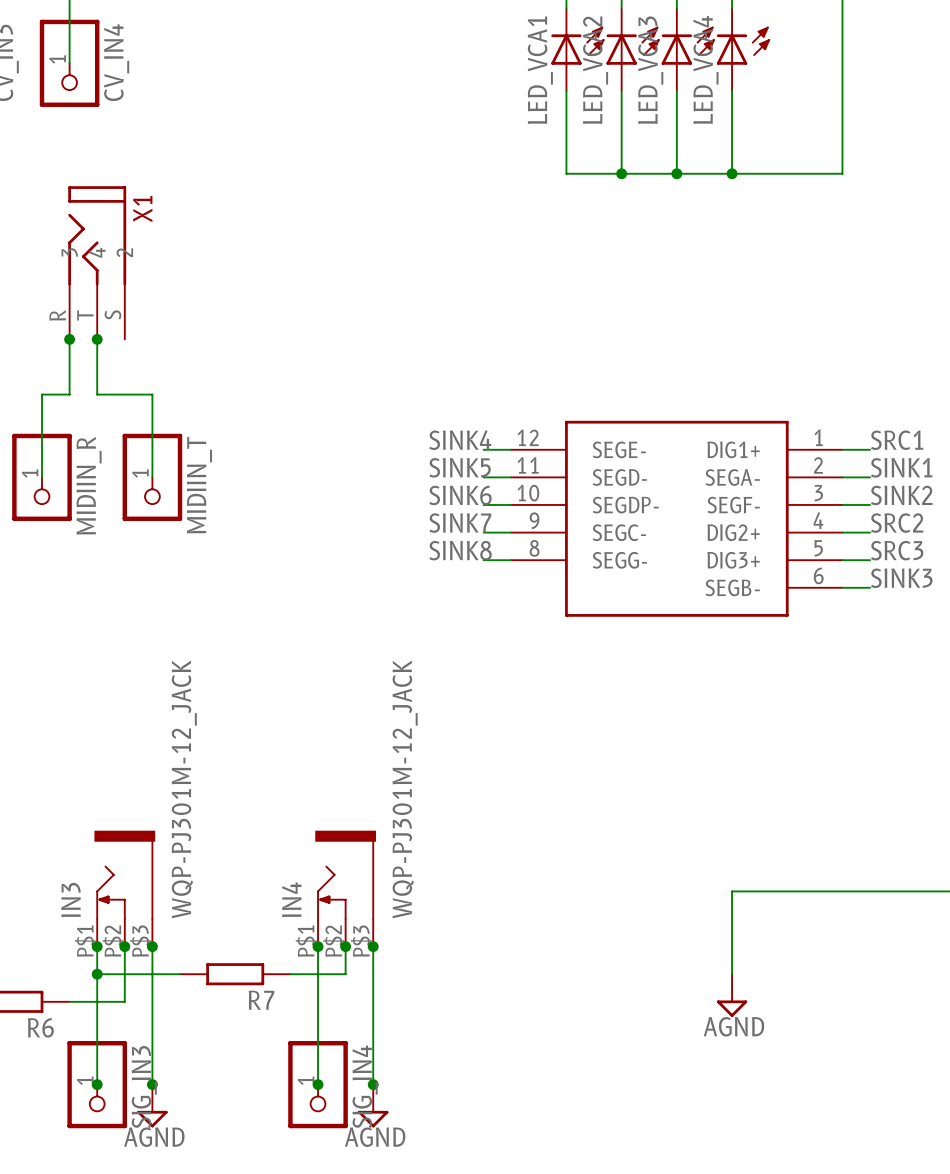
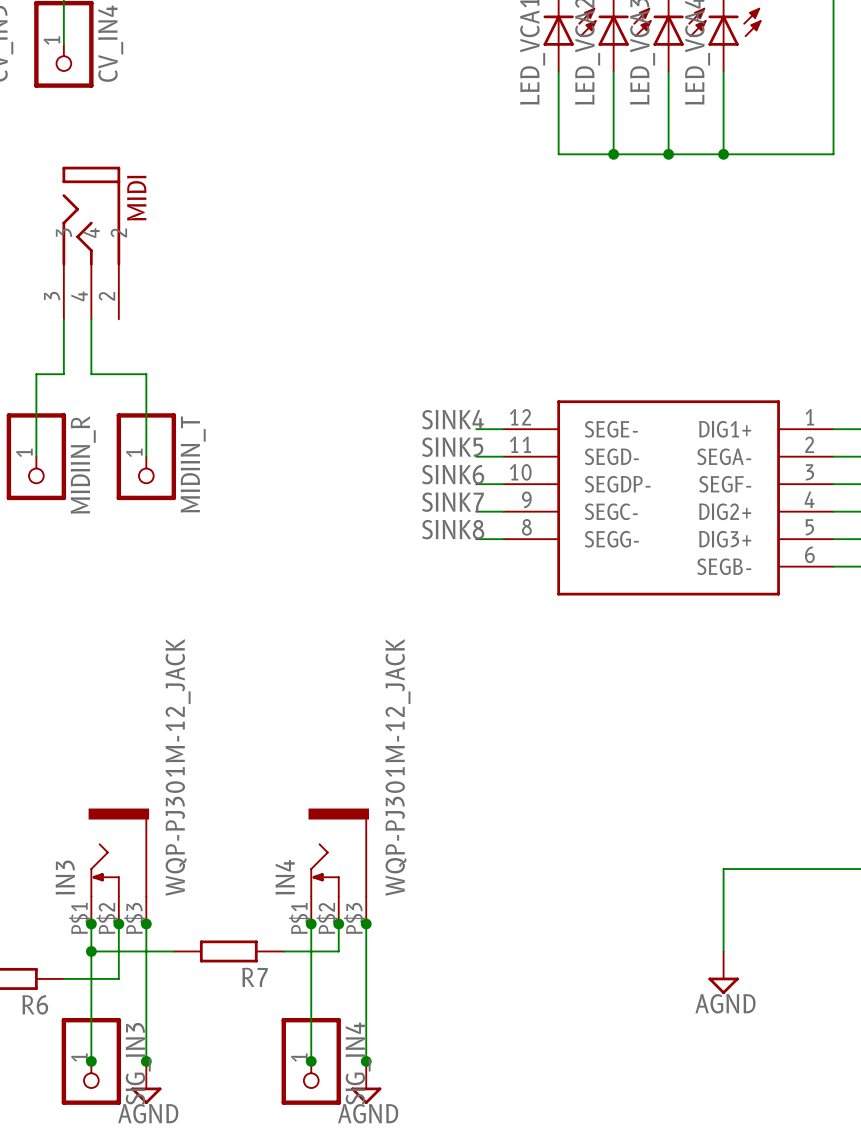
X1 name: X1 (142, 209) -> MIDI (136, 198)
X1 pin number: S (112, 314) -> 2 (106, 296)
X1 pin number: R (57, 315) -> 3 (52, 296)
X1 pin number: T (85, 315) -> 4 (79, 296)
junction: (69, 339) -> none
junction: (97, 339) -> none

